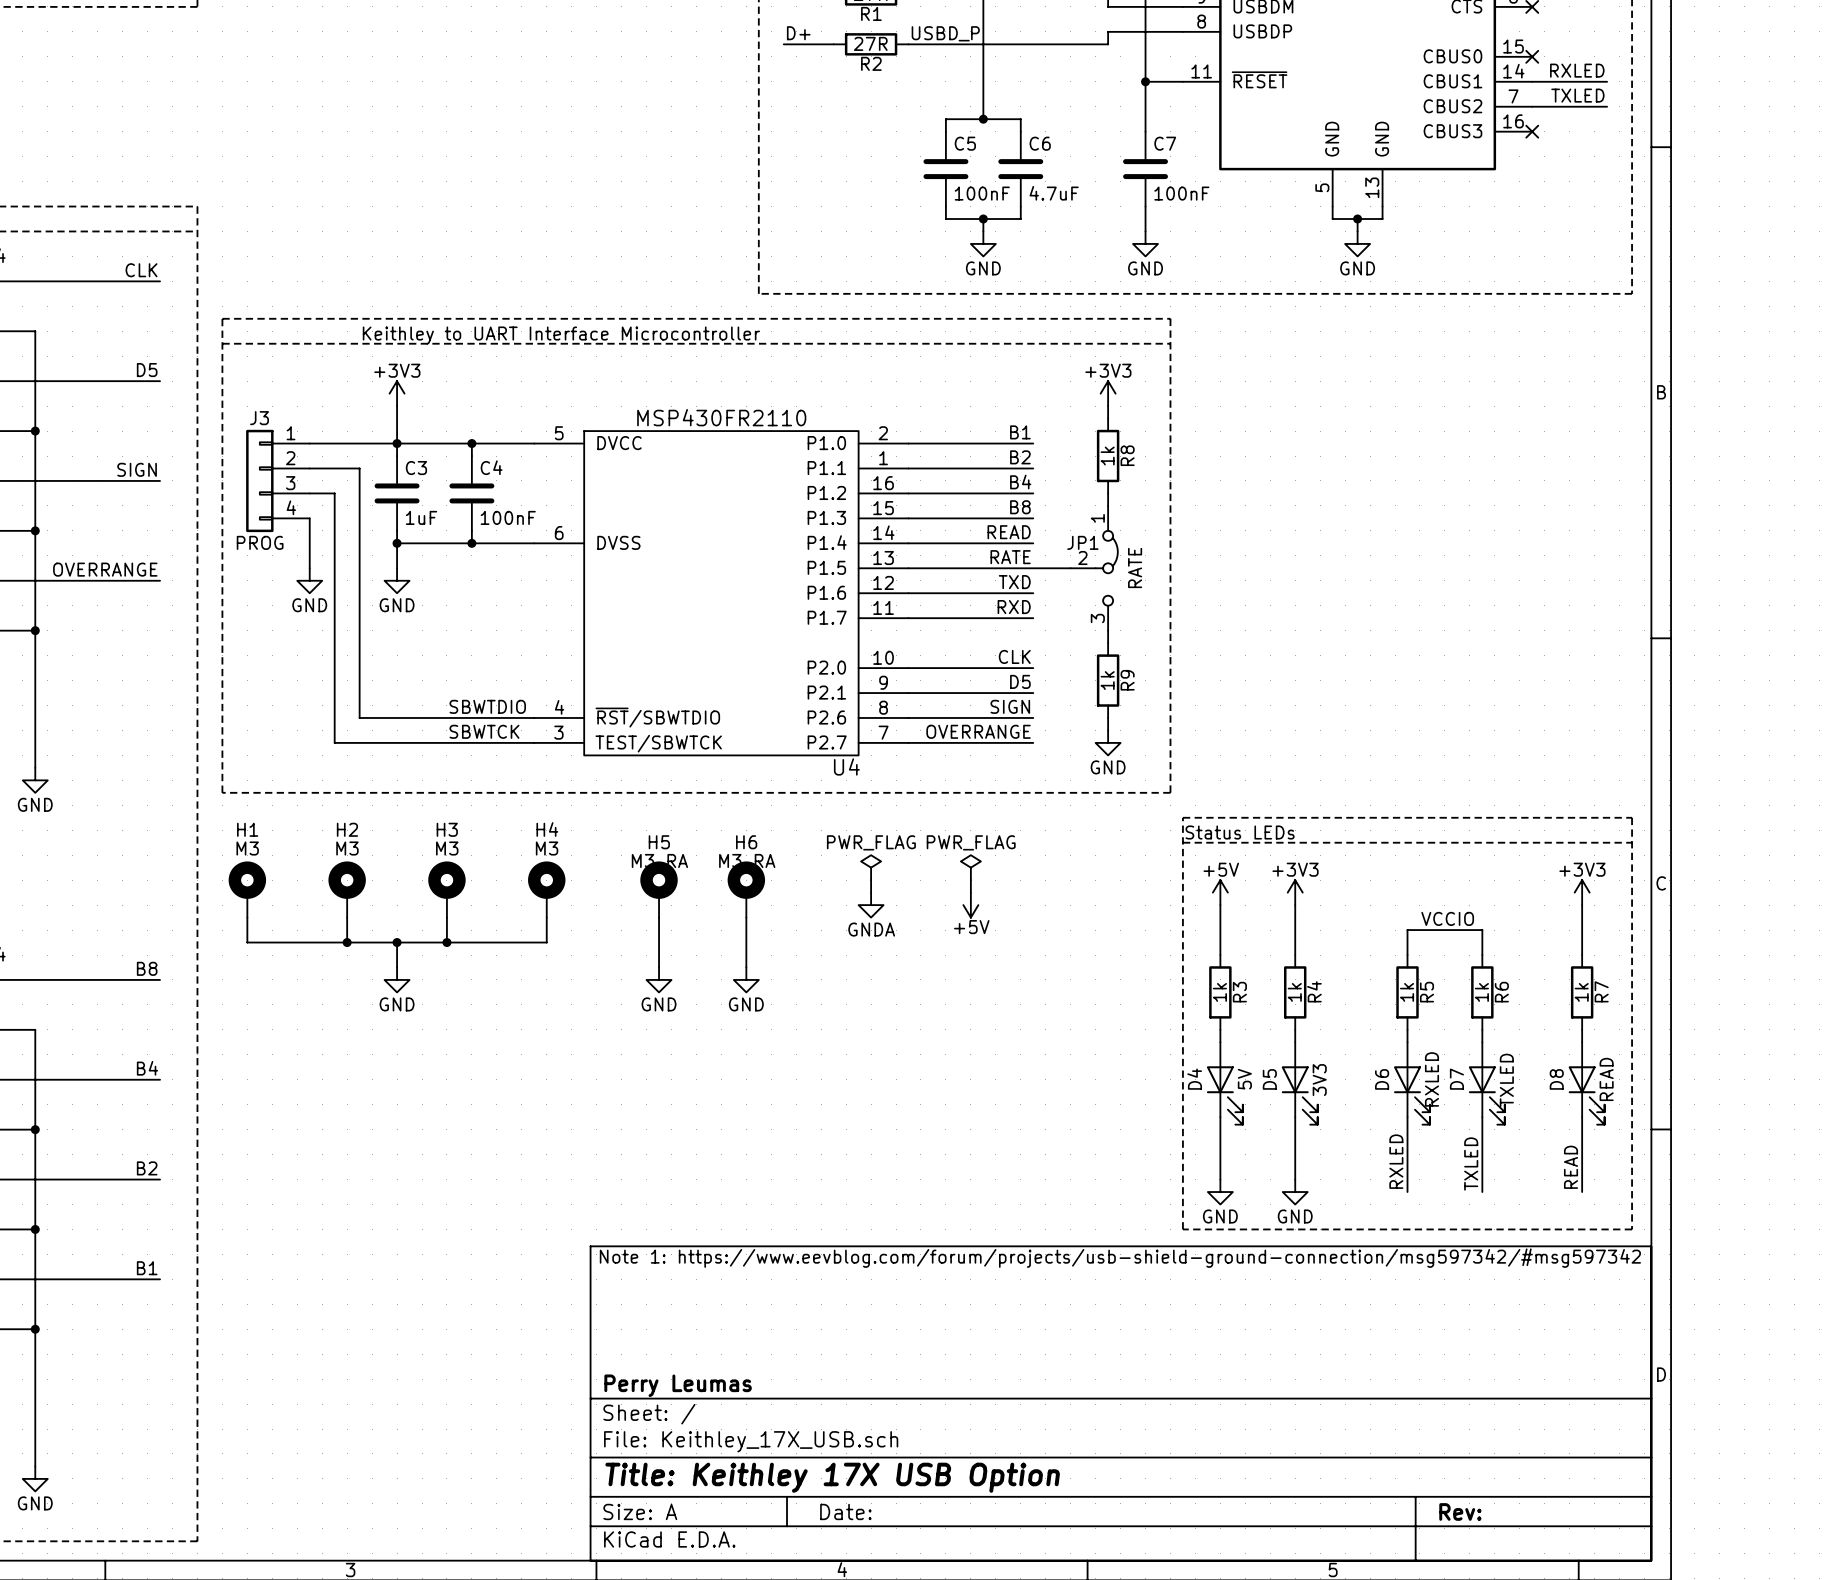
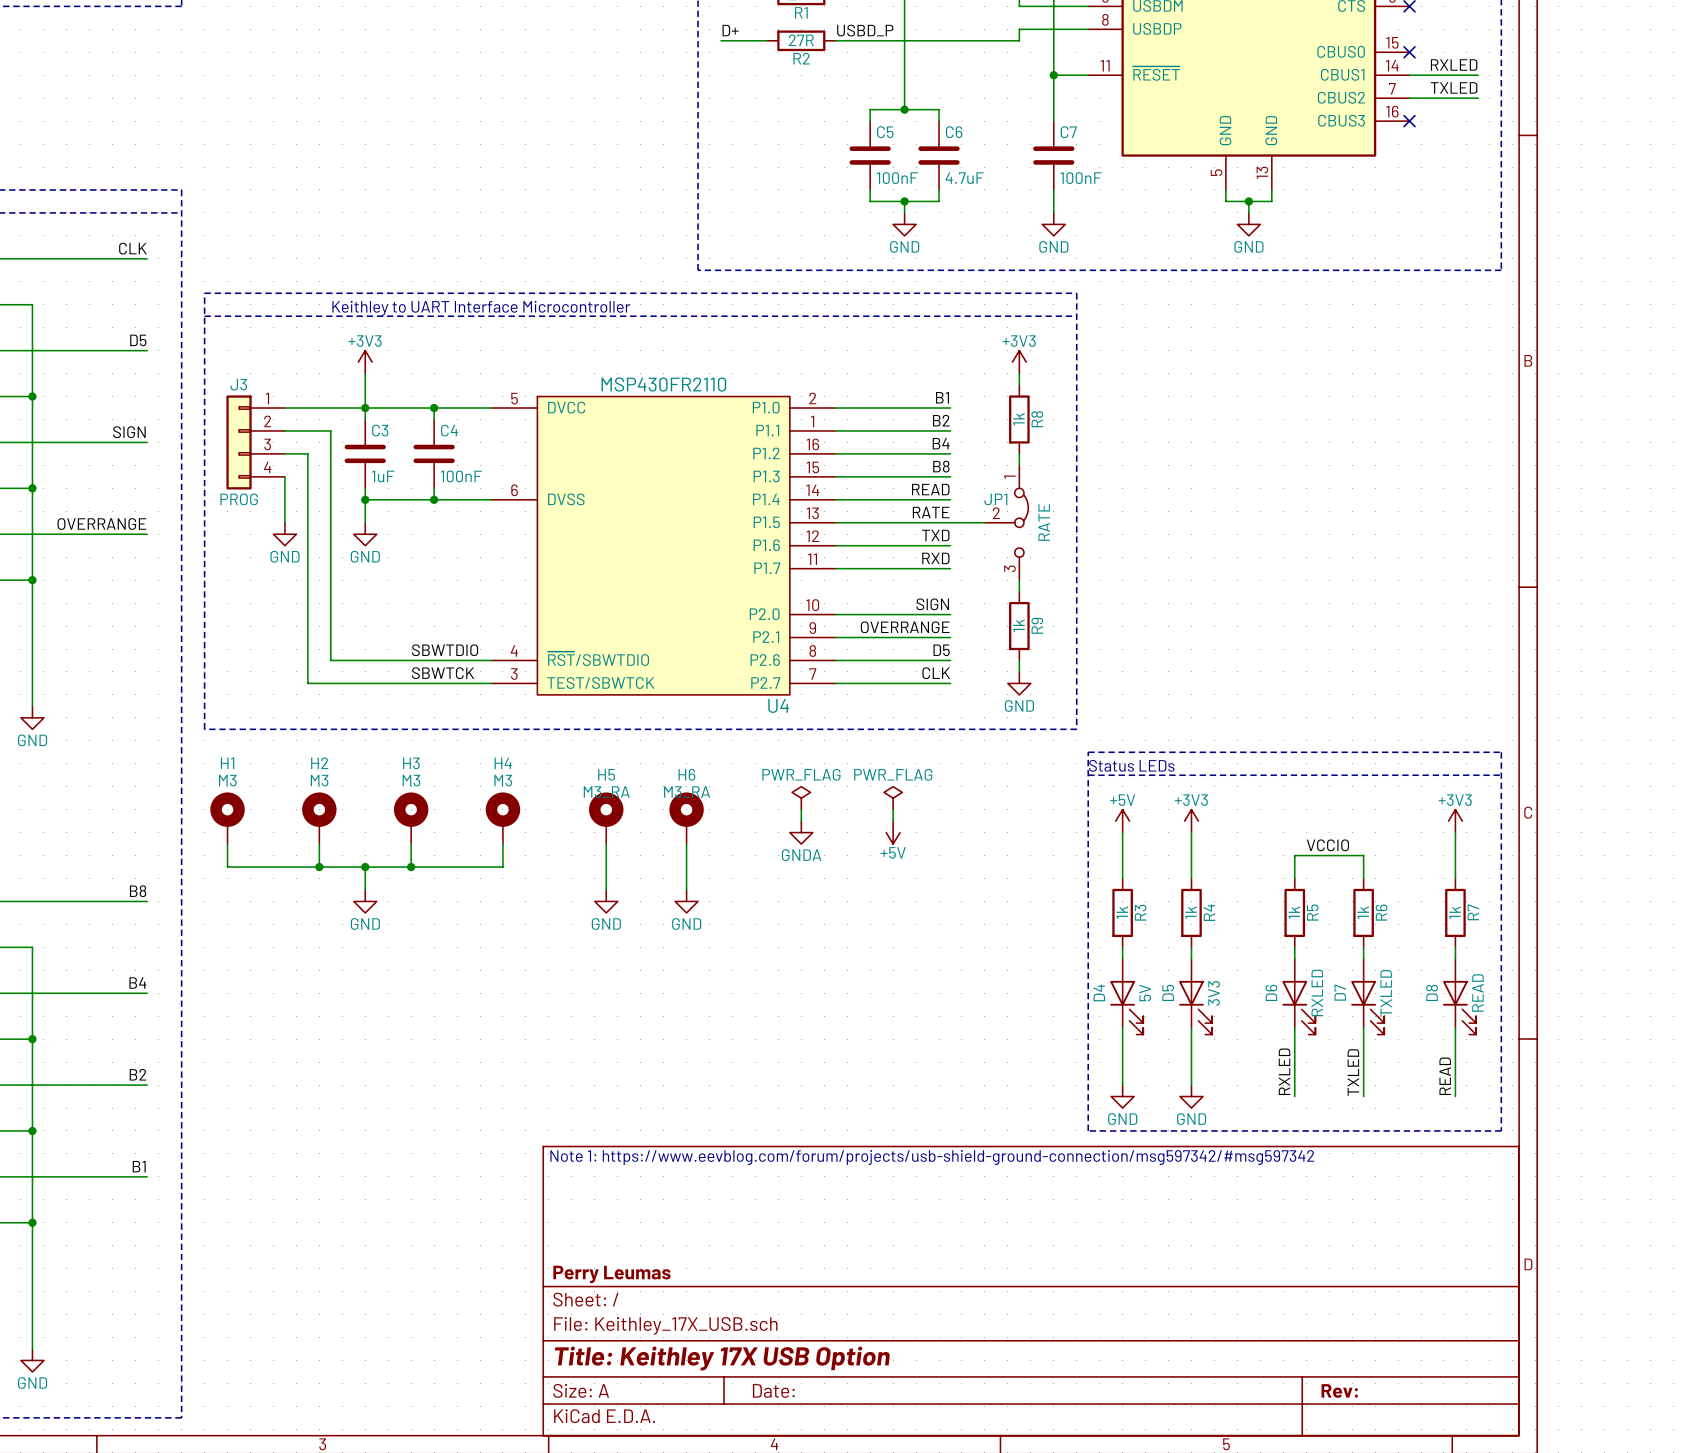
label: CLK (1014, 656) -> SIGN (932, 604)
label: D5 (1020, 681) -> OVERRANGE (905, 627)
label: SIGN (1010, 706) -> D5 (941, 650)
label: OVERRANGE (978, 731) -> CLK (936, 673)

